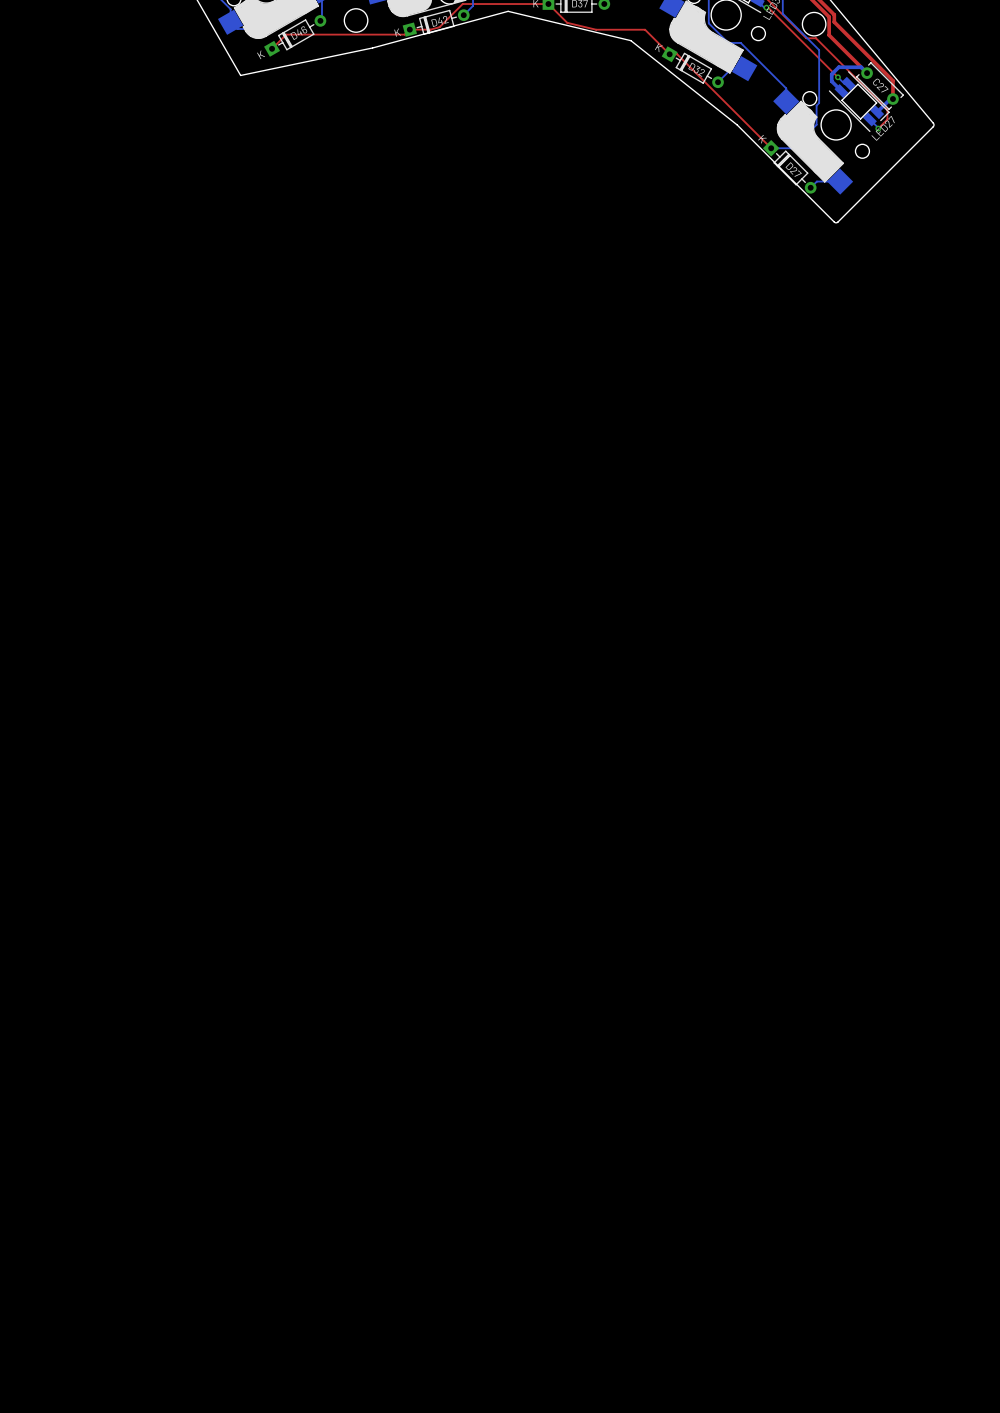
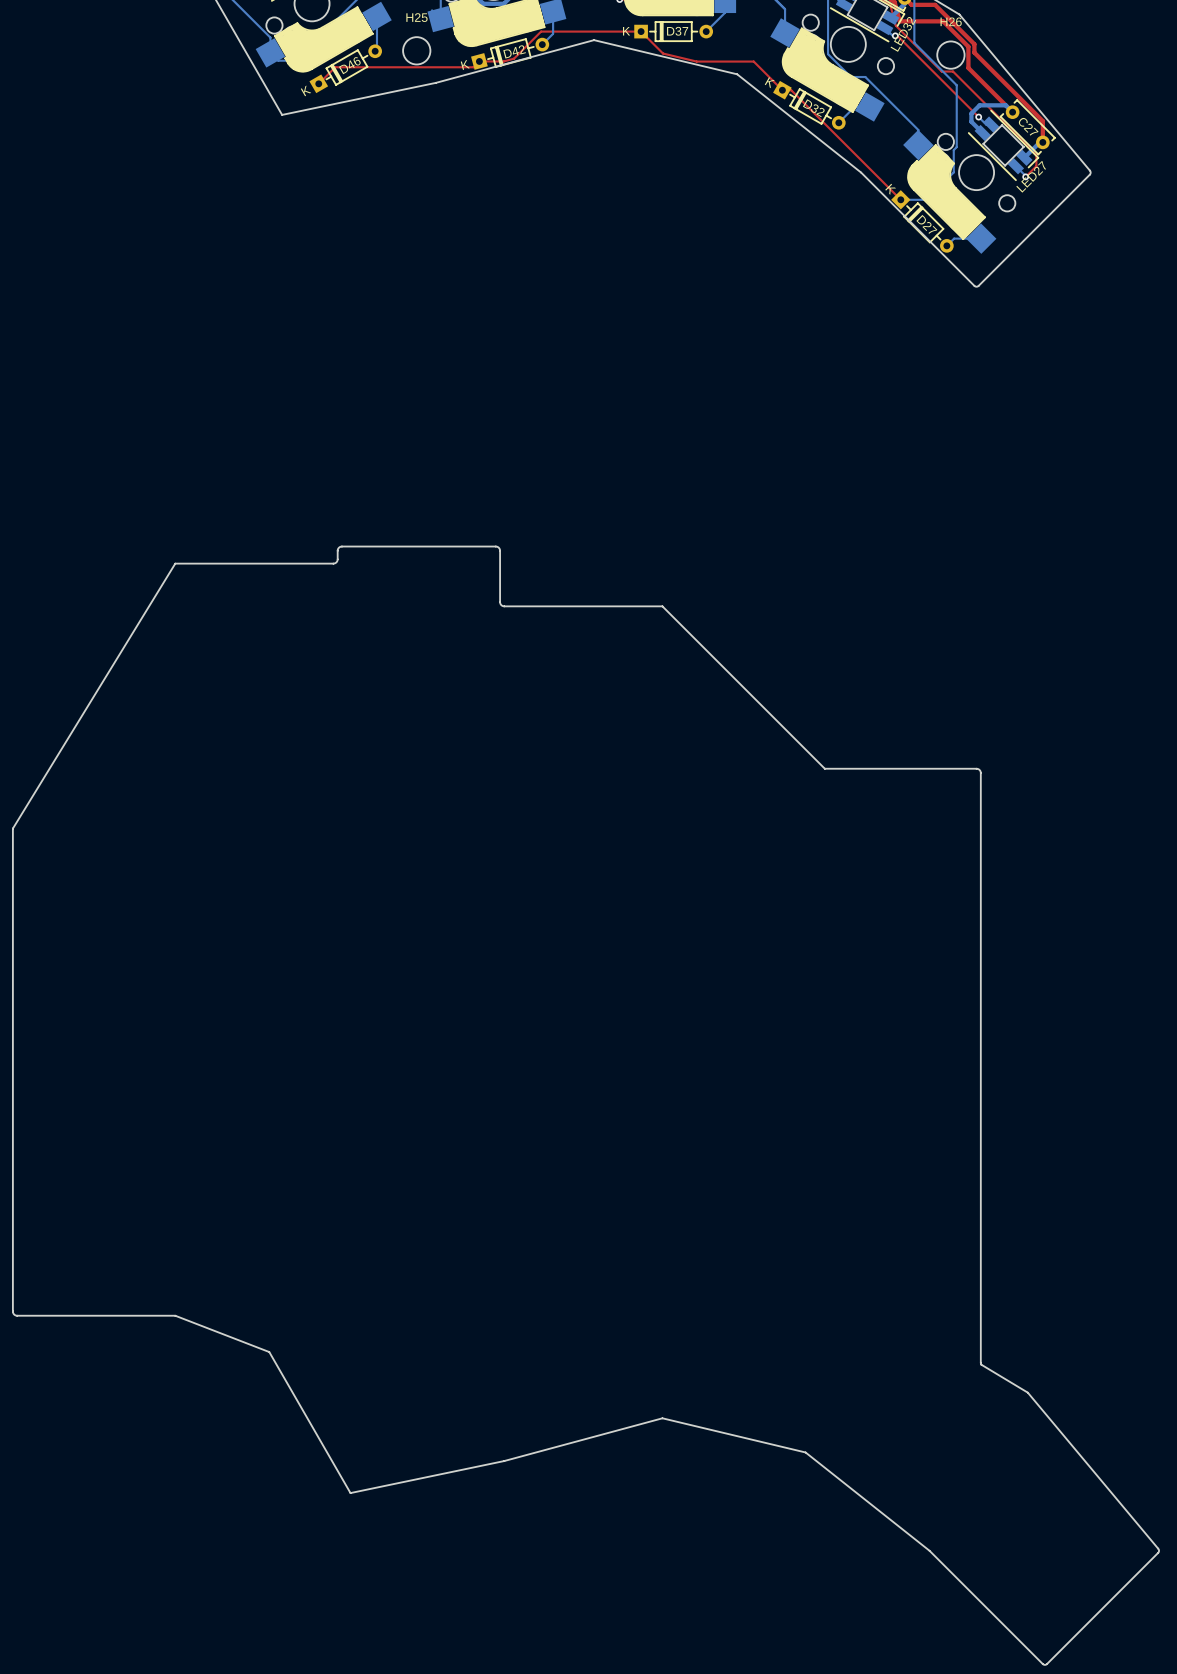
board edge: none -> (495, 546) (341, 546) (337, 549) (337, 560) (333, 563) (175, 563) (12, 828) (13, 1313) (17, 1315) (175, 1315) (269, 1352) (350, 1493) (504, 1461) (662, 1418) (805, 1452) (929, 1550) (1042, 1664) (1046, 1664) (1159, 1550) (1027, 1392) (980, 1363) (980, 771) (976, 768) (824, 768) (662, 606) (501, 605) (500, 602) (500, 550) (495, 546)

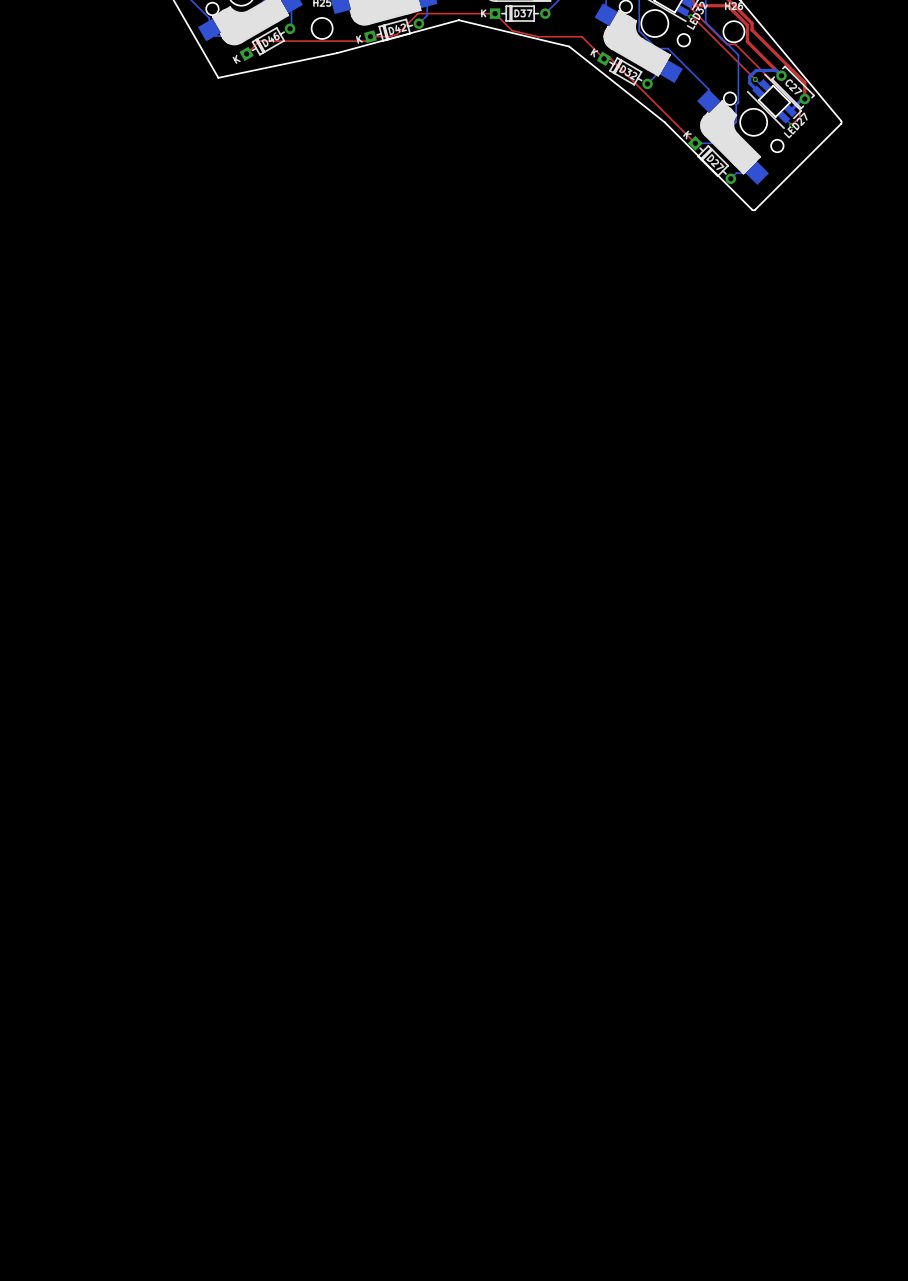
board edge: (495, 546) (341, 546) (337, 549) (337, 560) (333, 563) (175, 563) (12, 828) (13, 1313) (17, 1315) (175, 1315) (269, 1352) (350, 1493) (504, 1461) (662, 1418) (805, 1452) (929, 1550) (1042, 1664) (1046, 1664) (1159, 1550) (1027, 1392) (980, 1363) (980, 771) (976, 768) (824, 768) (662, 606) (501, 605) (500, 602) (500, 550) (495, 546) -> none

